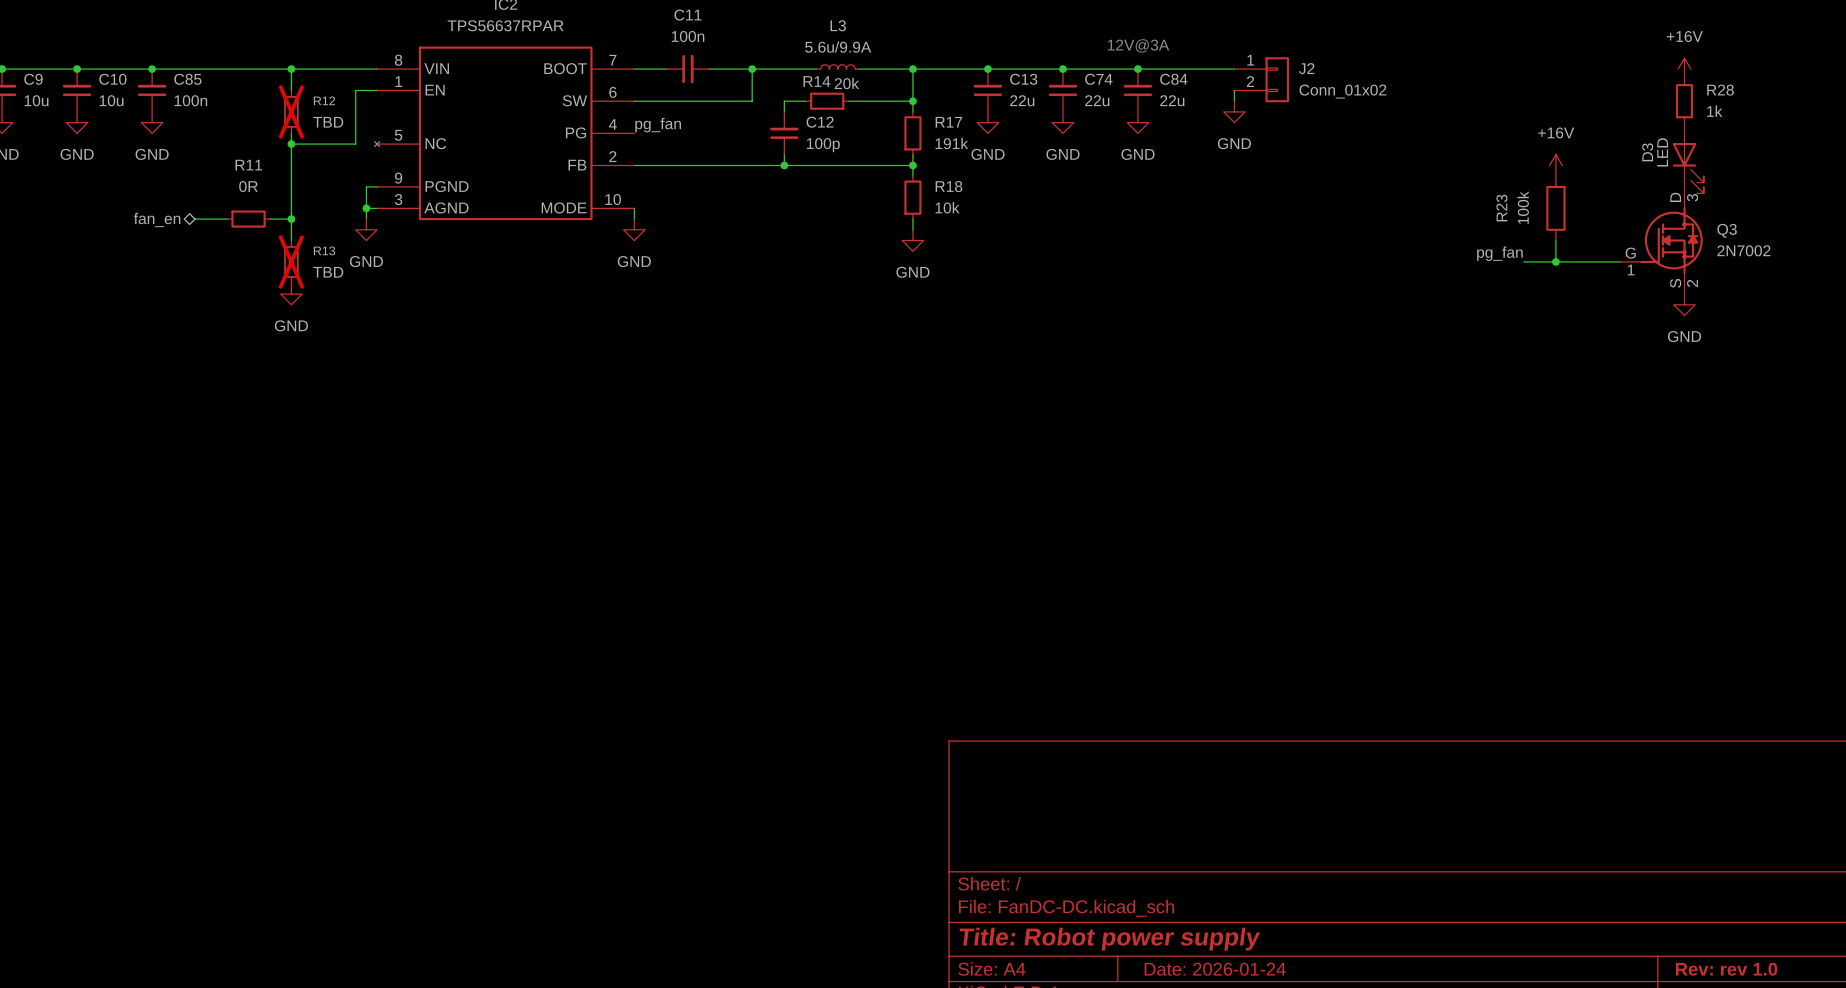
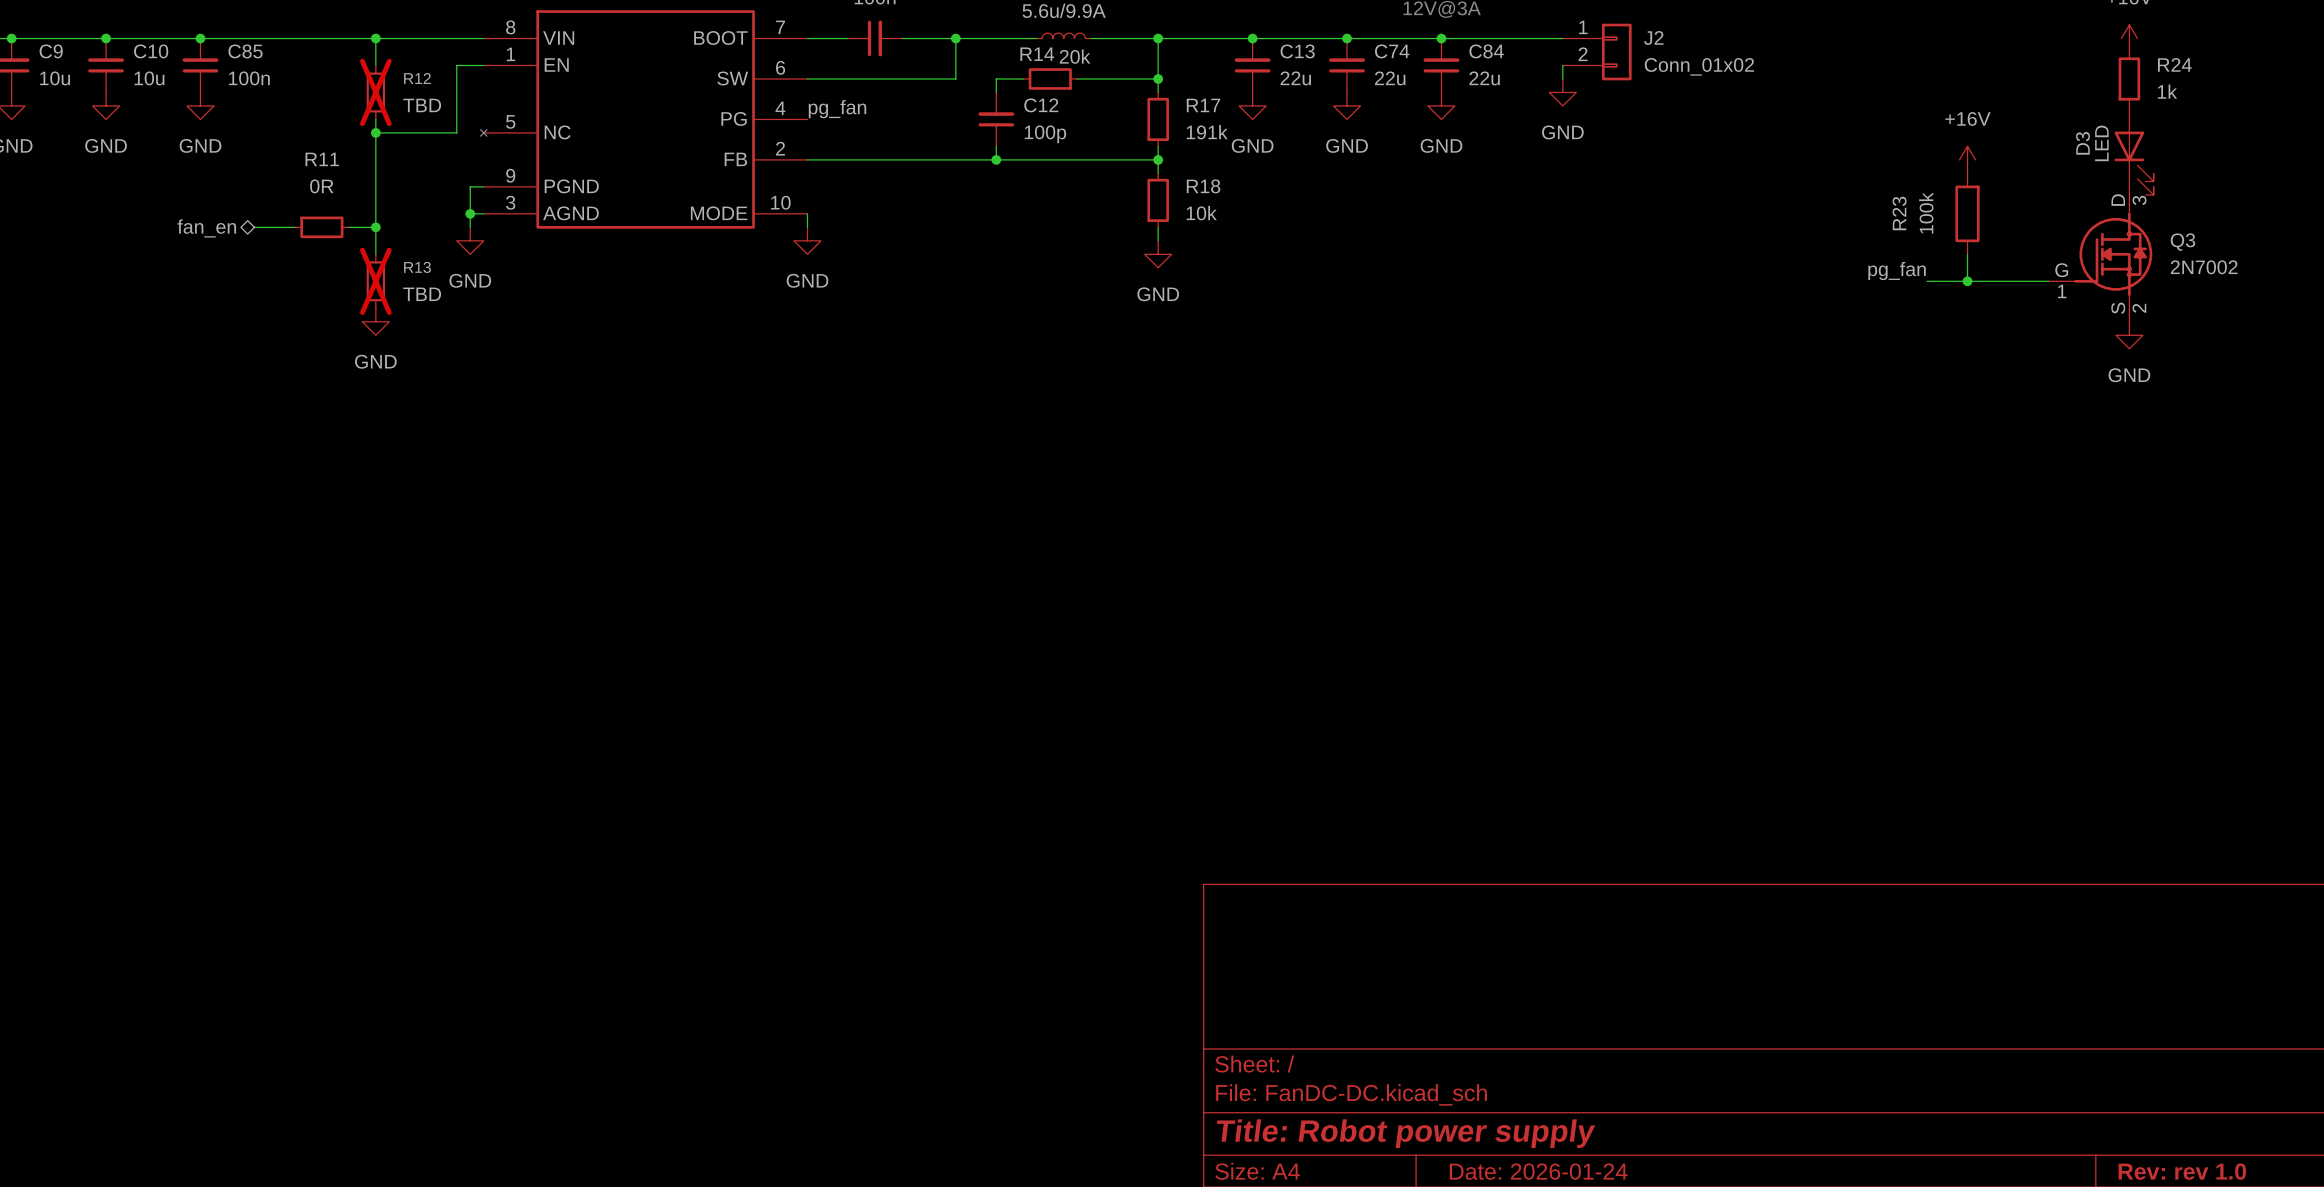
R28 name: R28 (1720, 90) -> R24 (2174, 64)

